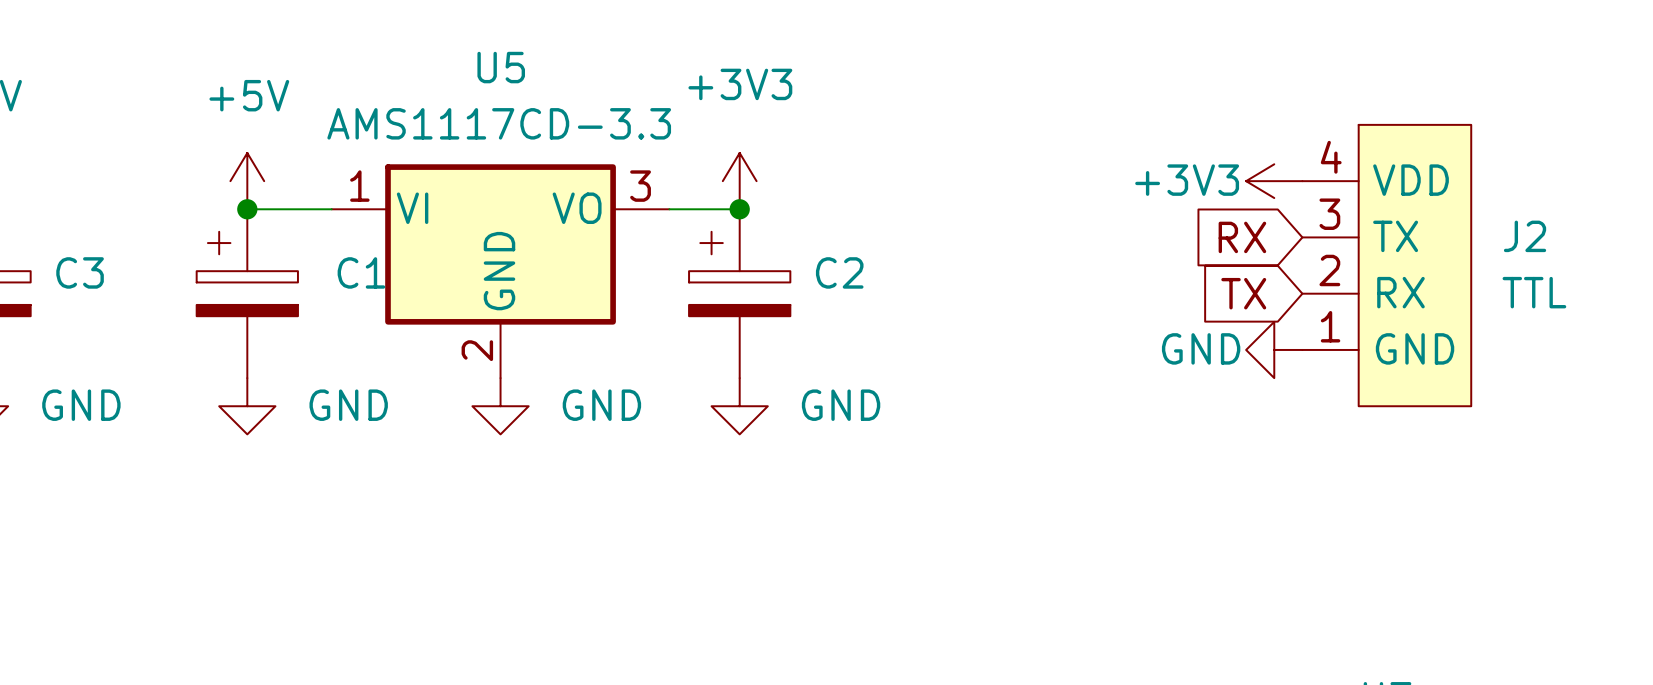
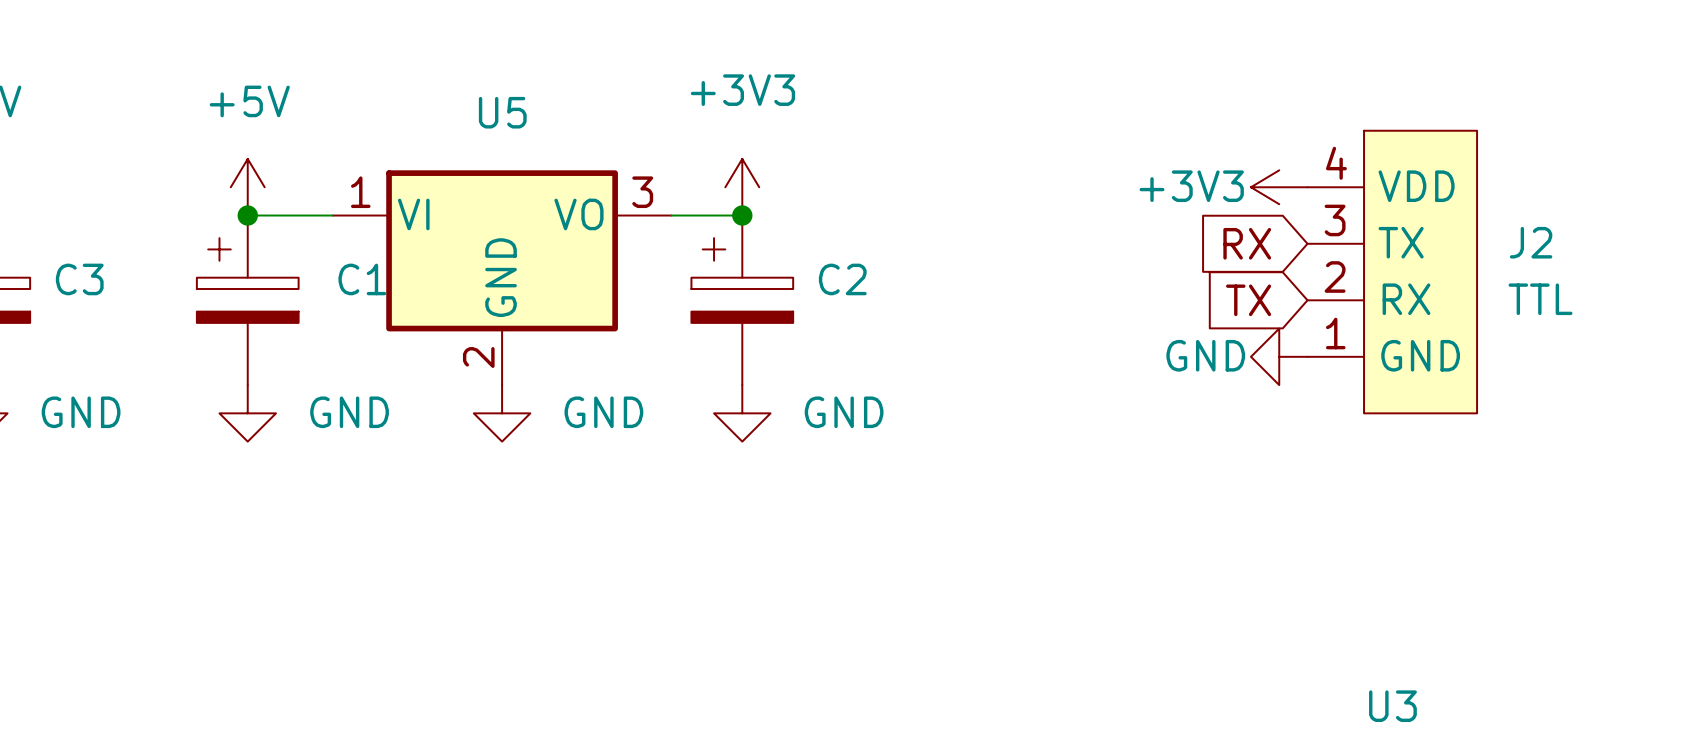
U5 name position: U5 (501, 67) -> U5 (502, 112)
U5 value: AMS1117CD-3.3 (499, 123) -> none

